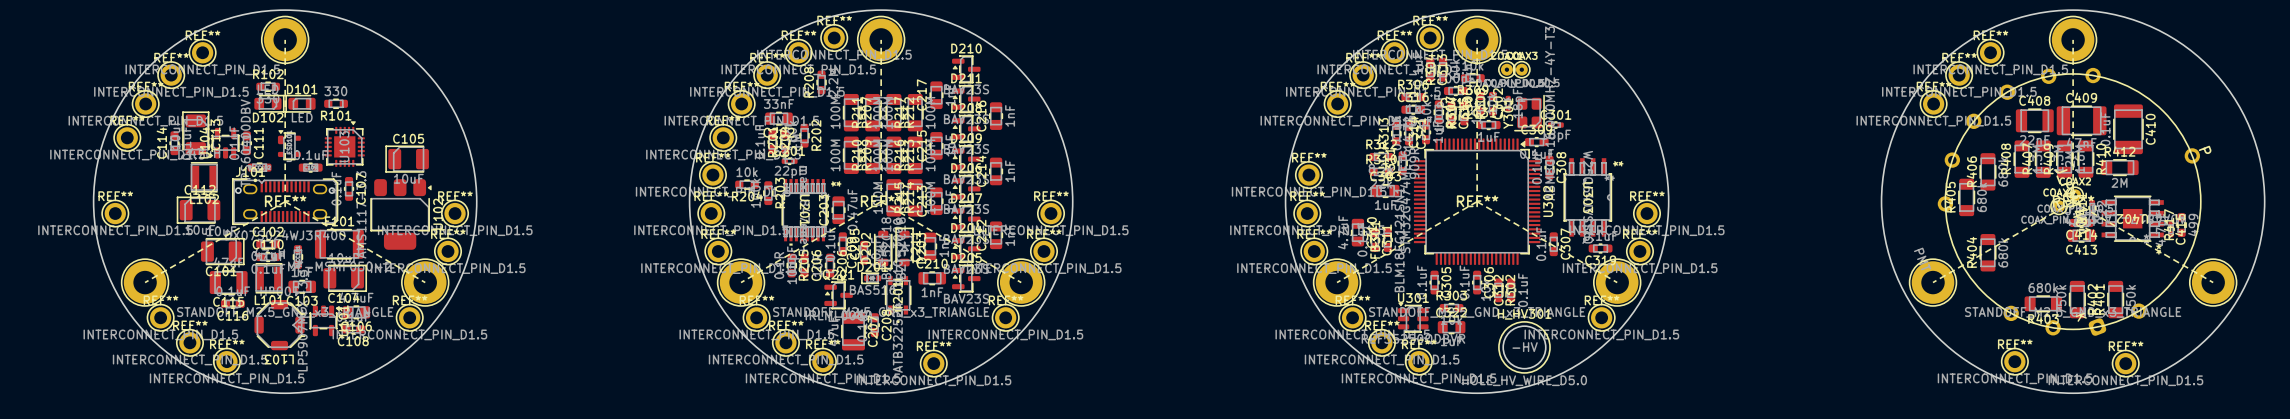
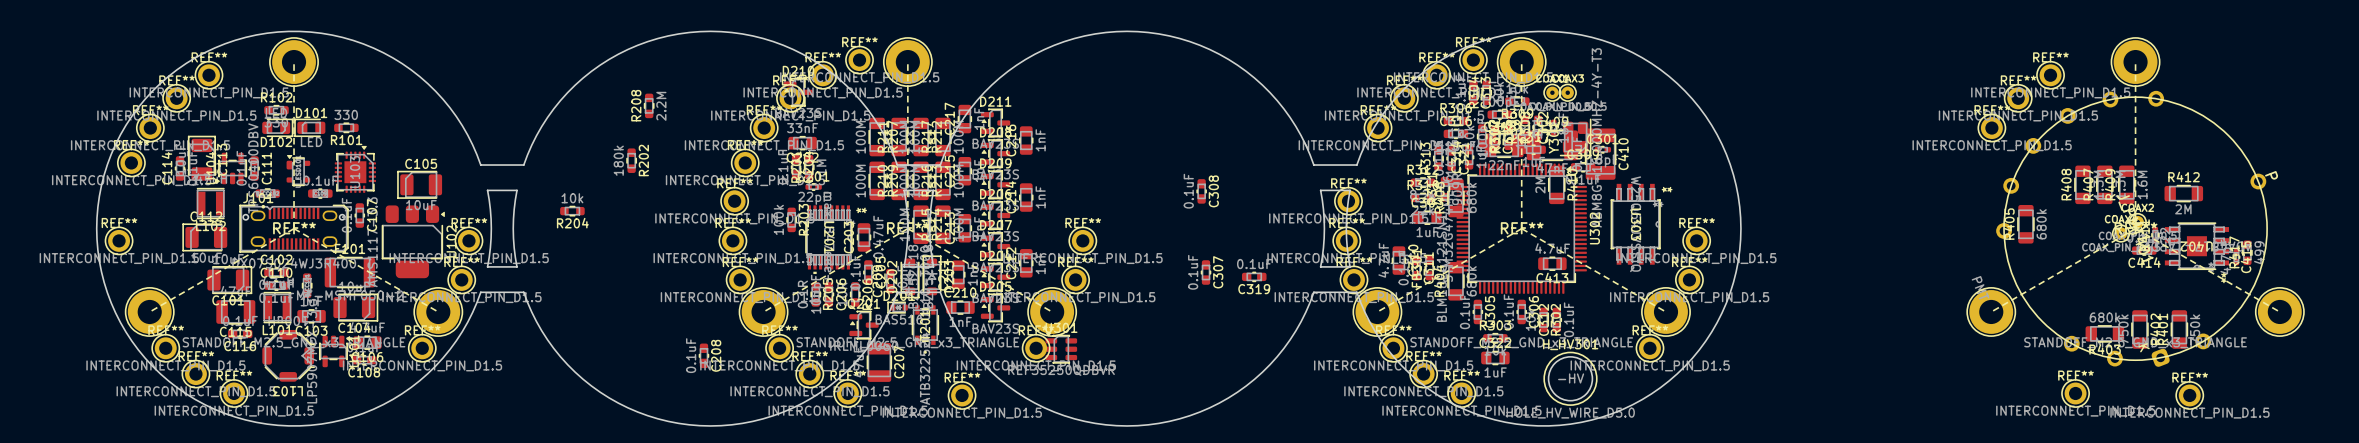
round board edge: [93, 9, 477, 394] -> none
round board edge: [689, 9, 1073, 394] -> none
round board edge: [1285, 9, 1669, 394] -> none
round board edge: [1881, 9, 2265, 394] -> none
D210 position: (966, 69) -> (798, 92)
R208 position: (821, 82) -> (649, 105)
C408 position: (2034, 120) -> (1504, 145)
C409 position: (2081, 120) -> (1552, 145)
C410 position: (2128, 129) -> (1600, 154)
R202 position: (804, 135) -> (631, 160)
board edge: none -> (480, 165) (523, 165) (536, 135) (560, 100) (583, 78) (609, 59) (627, 49) (657, 38) (689, 32) (710, 31) (731, 32) (763, 38) (793, 49) (812, 59) (837, 78) (860, 100) (884, 135) (897, 165) (940, 165) (948, 145) (964, 117) (984, 92) (1007, 71) (1034, 54) (1064, 41) (1095, 33) (1127, 31) (1158, 33) (1179, 38) (1199, 45) (1228, 59) (1262, 85) (1283, 108) (1301, 135) (1313, 165) (1356, 165) (1369, 135) (1387, 107) (1409, 83) (1435, 63) (1464, 48) (1494, 37) (1527, 32) (1559, 32) (1602, 40) (1632, 52) (1668, 76) (1692, 99) (1717, 134) (1730, 164) (1739, 206) (1740, 239) (1736, 271) (1722, 312) (1705, 341) (1684, 366) (1651, 393) (1622, 409) (1581, 422) (1548, 425) (1516, 424) (1484, 416) (1454, 404) (1426, 387) (1409, 373) (1387, 349) (1369, 322) (1356, 292) (1313, 292) (1295, 330) (1277, 356) (1254, 379) (1228, 397) (1209, 407) (1179, 418) (1158, 423) (1127, 425) (1095, 423) (1074, 418) (1044, 407) (1025, 397) (999, 379) (977, 356) (958, 330) (940, 292) (897, 292) (884, 321) (867, 348) (845, 372) (821, 392) (802, 403) (773, 415) (742, 423) (710, 425) (689, 424) (657, 418) (637, 412) (609, 397) (583, 379) (553, 348) (536, 321) (523, 292) (480, 292) (467, 322) (449, 349) (427, 373) (402, 393) (373, 409) (342, 419) (310, 425) (277, 425) (256, 422) (225, 413) (205, 404) (177, 387) (160, 373) (138, 349) (120, 322) (107, 292) (97, 250) (97, 217) (101, 185) (115, 144) (131, 116) (160, 83) (186, 63) (225, 43) (267, 33) (299, 31) (342, 37) (383, 52) (419, 76) (443, 99) (467, 135) (480, 165)
R410 position: (2085, 159) -> (1556, 184)
board edge: none -> (487, 190) (516, 190) (513, 228) (516, 266) (487, 266) (491, 228) (487, 190)
board edge: none -> (904, 190) (933, 190) (929, 228) (933, 266) (904, 266) (907, 228) (904, 190)
board edge: none -> (1320, 190) (1350, 190) (1346, 228) (1350, 266) (1320, 266) (1324, 228) (1320, 190)
C308 position: (1549, 167) -> (1201, 191)
R406 position: (1987, 171) -> (1455, 197)
R204 position: (747, 184) -> (572, 211)
C413 position: (2081, 235) -> (1552, 263)
C307 position: (1553, 244) -> (1206, 272)
C319 position: (1600, 248) -> (1254, 276)
R404 position: (1987, 252) -> (1455, 281)
U301 position: (1413, 317) -> (1061, 348)
C208 position: (874, 325) -> (703, 355)

